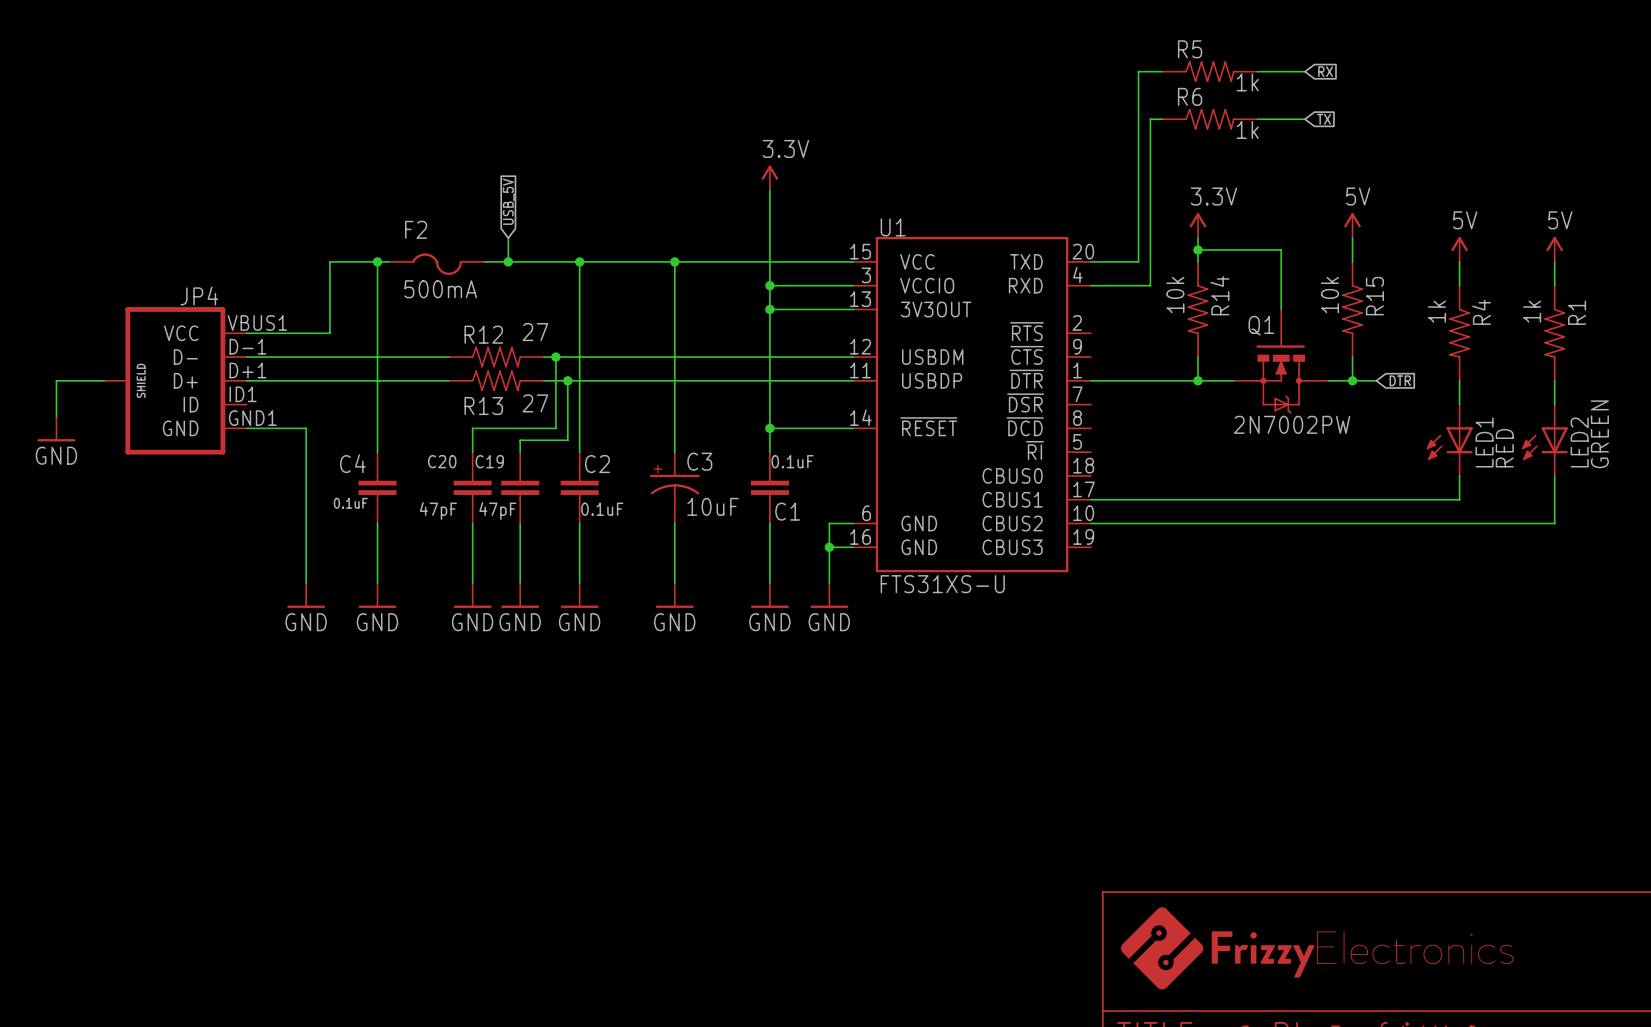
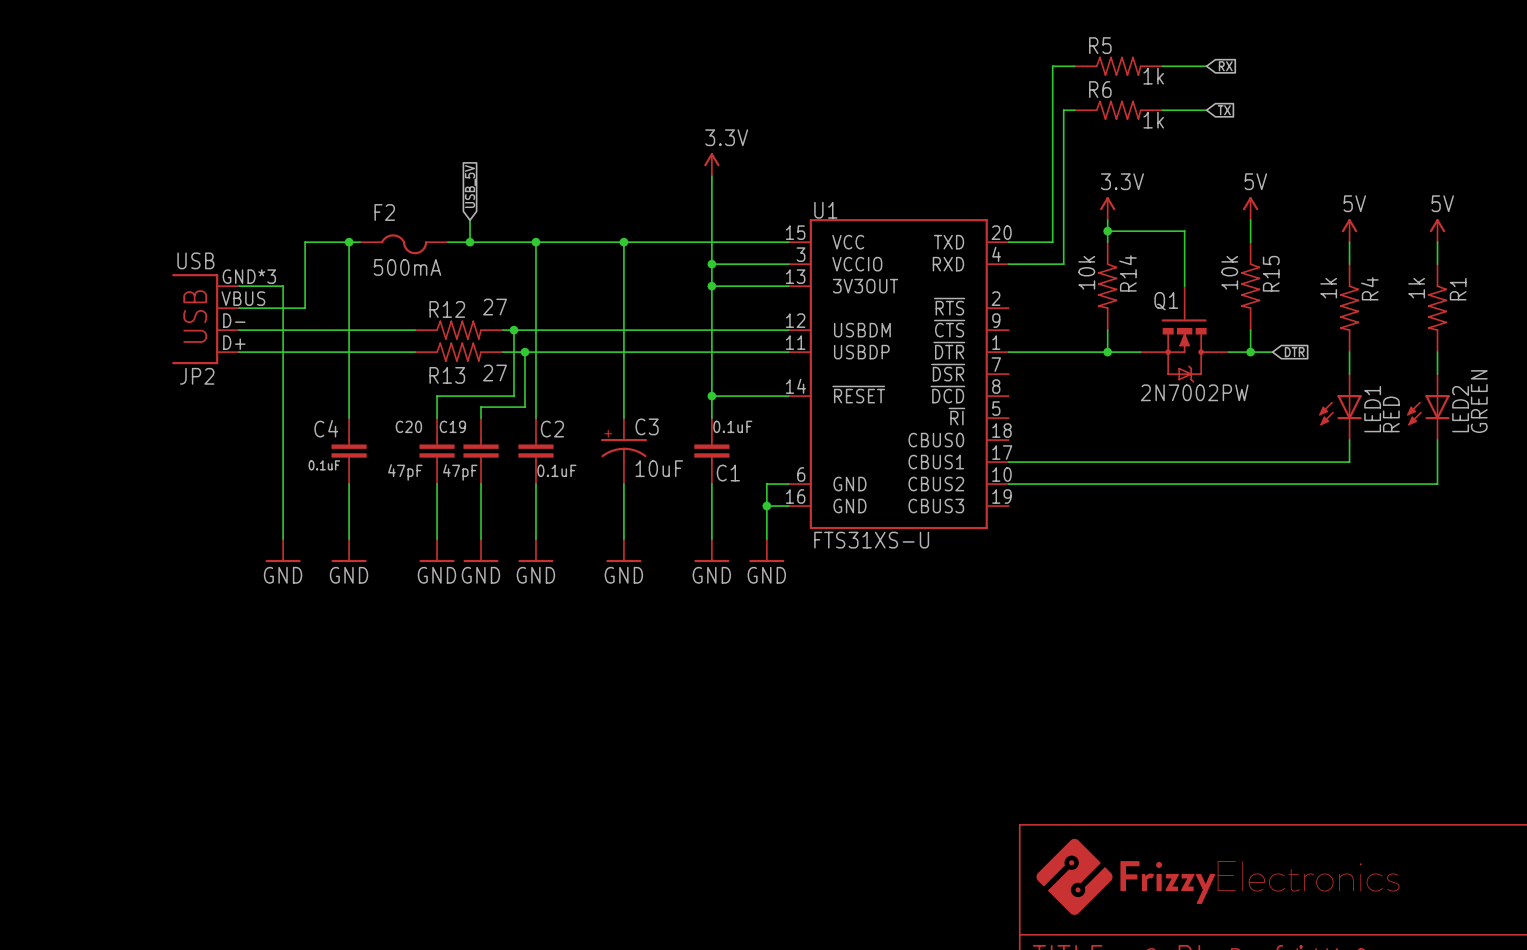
JP2: none -> USB (205, 319)
wire: (104, 380) (56, 380) (56, 416) -> none
JP4: (175, 380) -> none
power symbol: GND (56, 428) -> none
wire: (246, 428) (306, 428) -> (239, 286) (283, 286) (283, 396)

